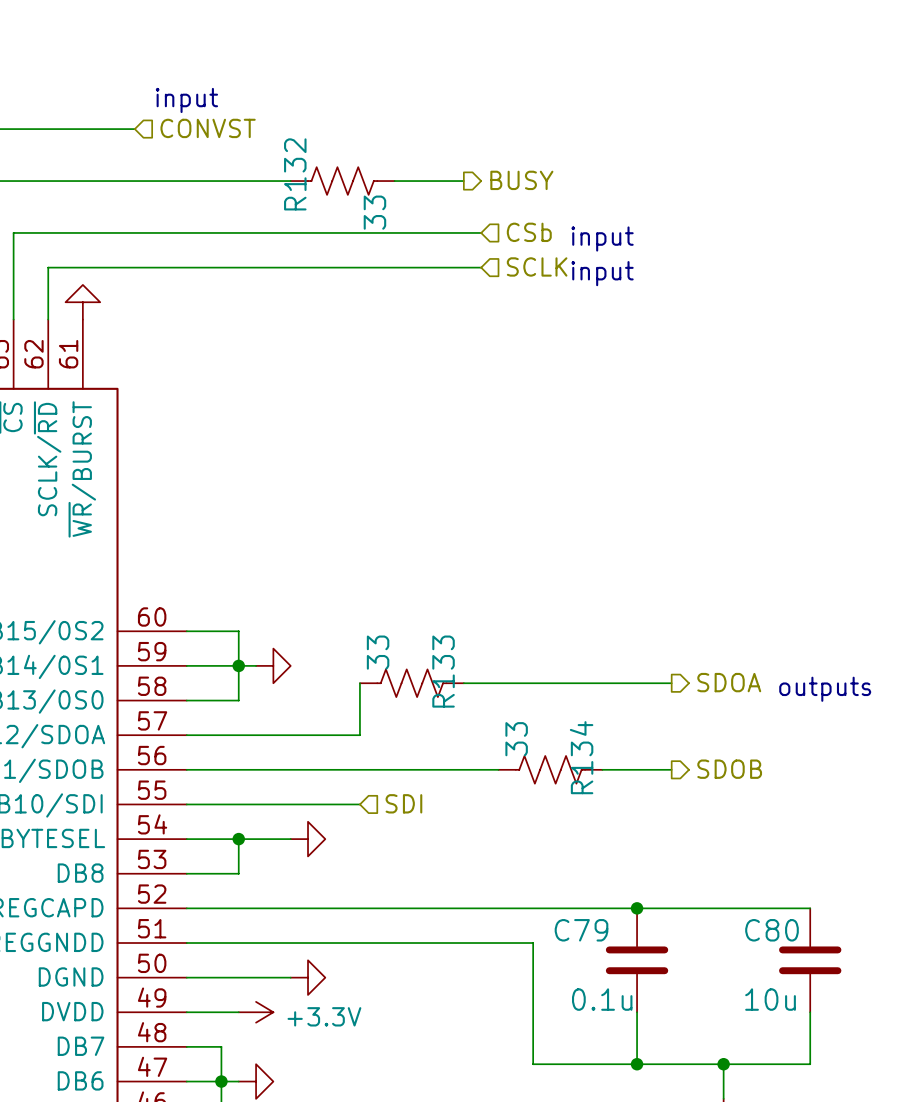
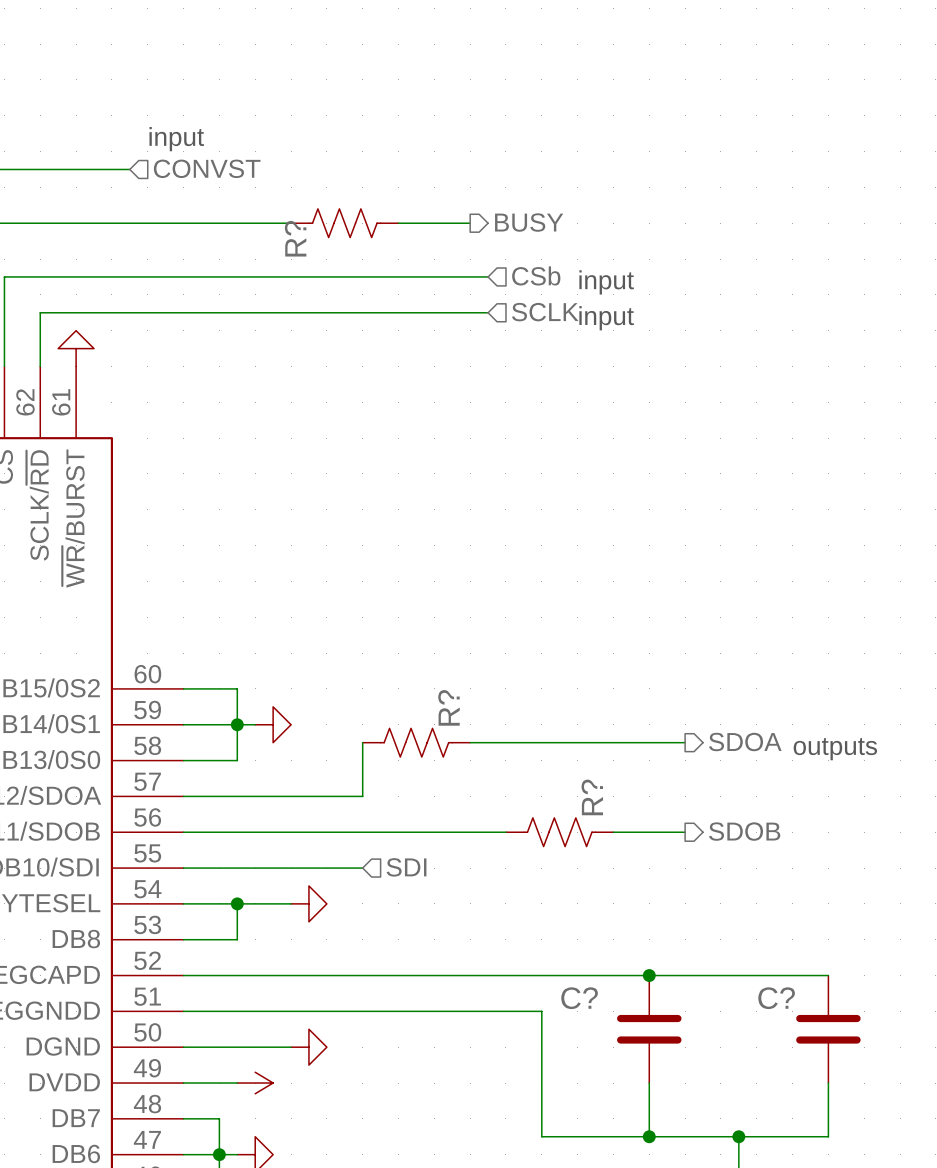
R132 name: R132 (295, 174) -> R? (295, 238)
R132 value: 33 (374, 212) -> none
R133 value: 33 (378, 652) -> none
R133 name: R133 (443, 671) -> R? (448, 707)
R134 value: 33 (516, 739) -> none
R134 name: R134 (581, 757) -> R? (592, 797)
C79 name: C79 (581, 930) -> C? (579, 998)
C80 name: C80 (771, 930) -> C? (776, 998)
C79 value: 0.1u (602, 999) -> none
C80 value: 10u (770, 999) -> none
power symbol text: +3.3V (324, 1016) -> none

